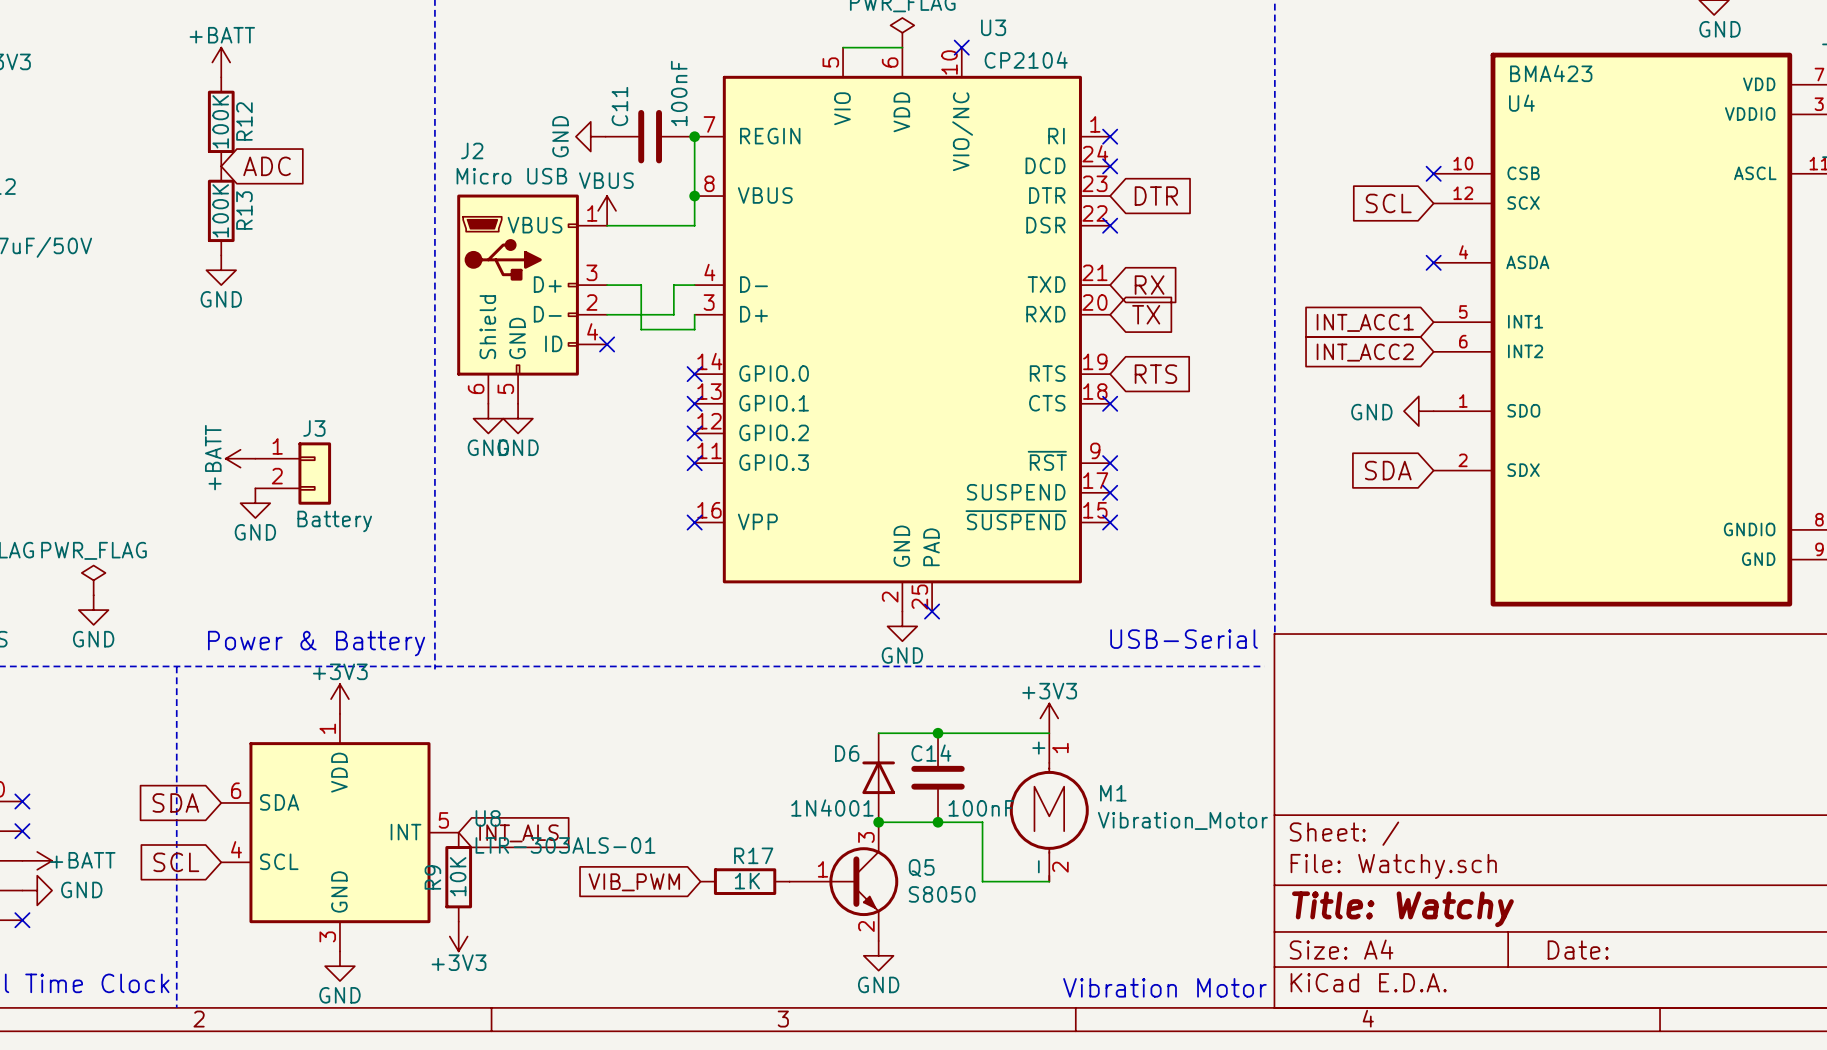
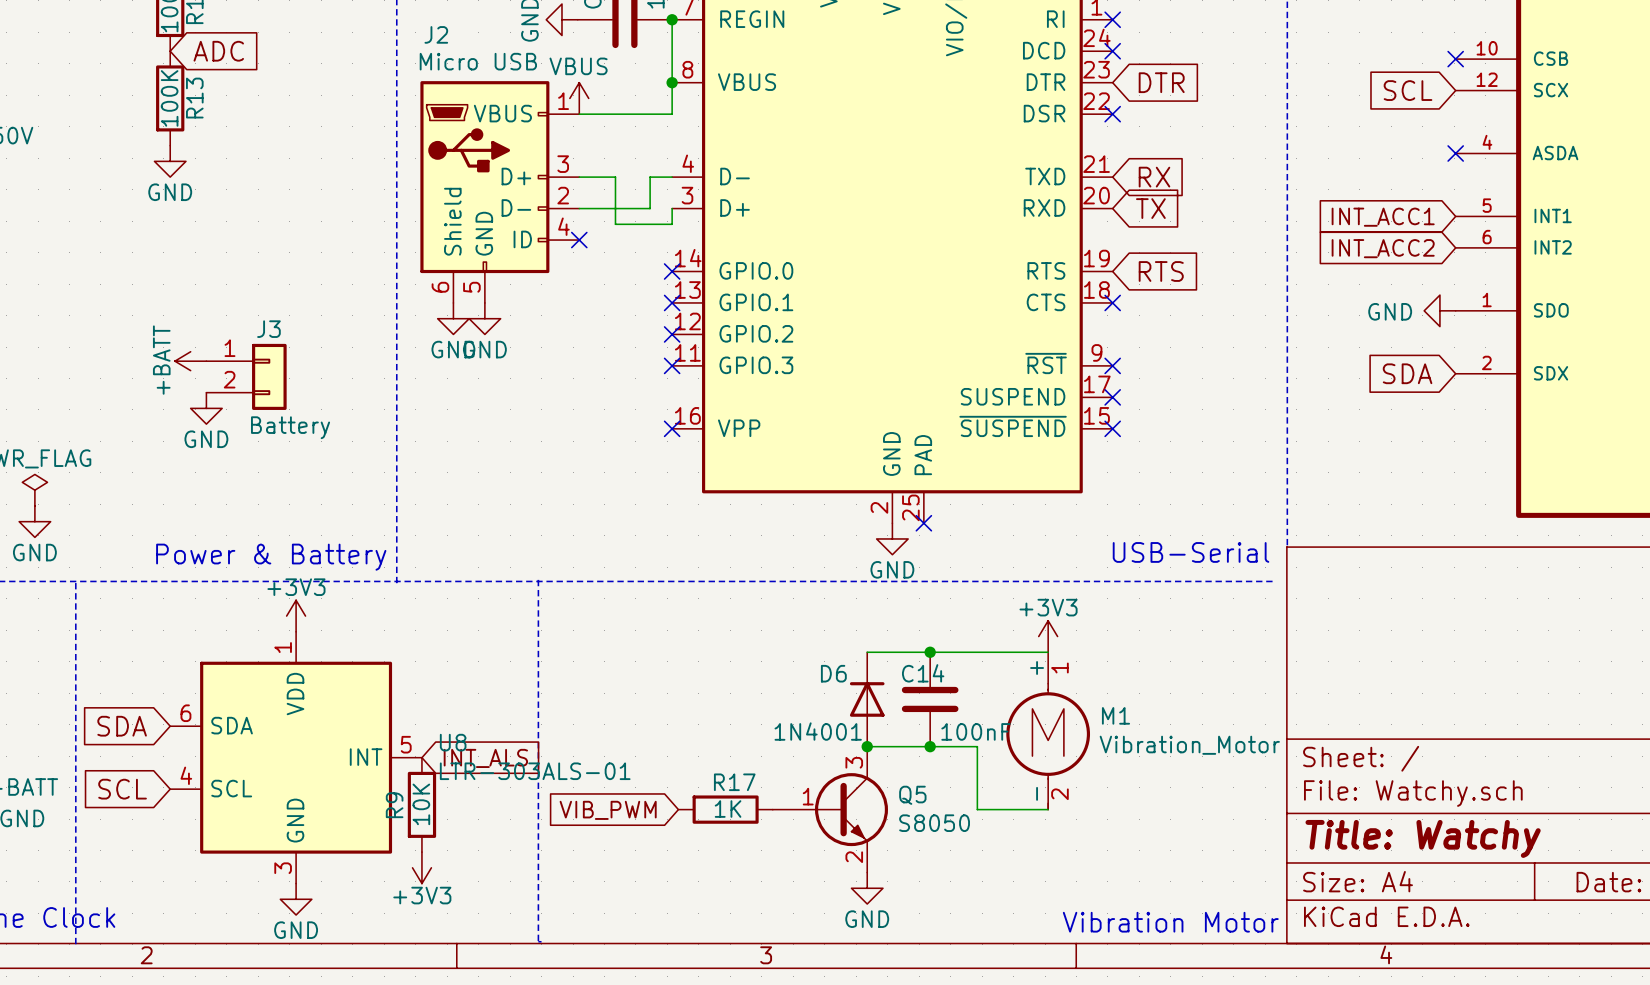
line: none -> (538, 579) (538, 941) (541, 941)
line: (176, 666) (176, 1007) -> (75, 583) (75, 944)

